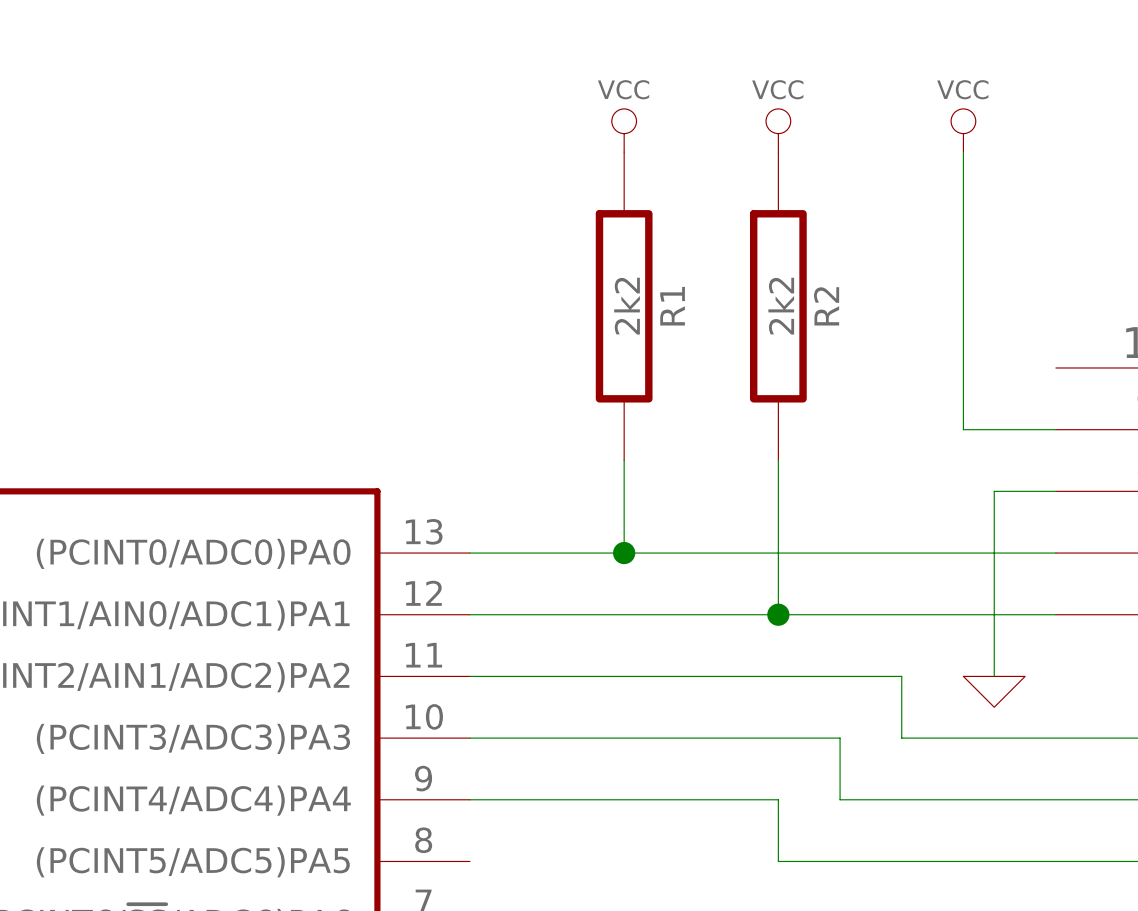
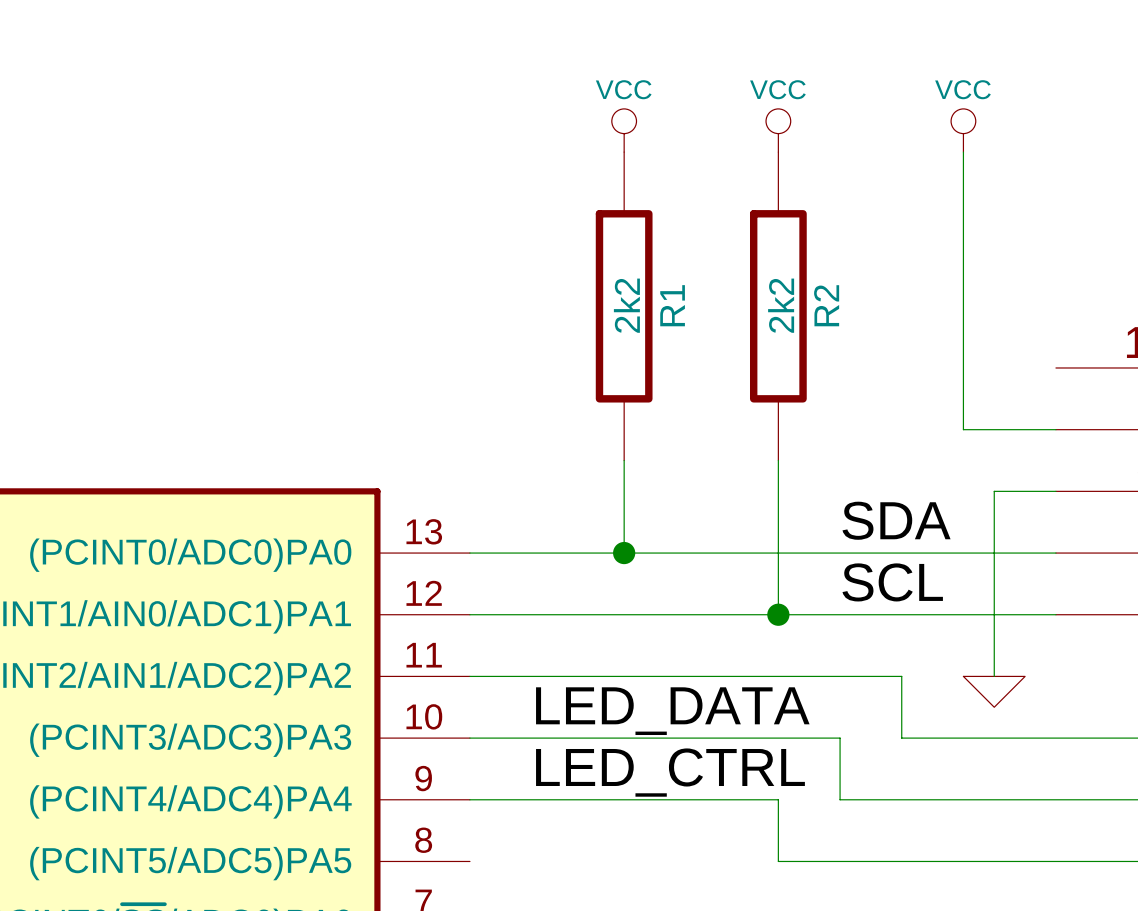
label: none -> SDA (896, 520)
label: none -> SCL (892, 582)
label: none -> LED_DATA (672, 711)
label: none -> LED_CTRL (670, 772)

